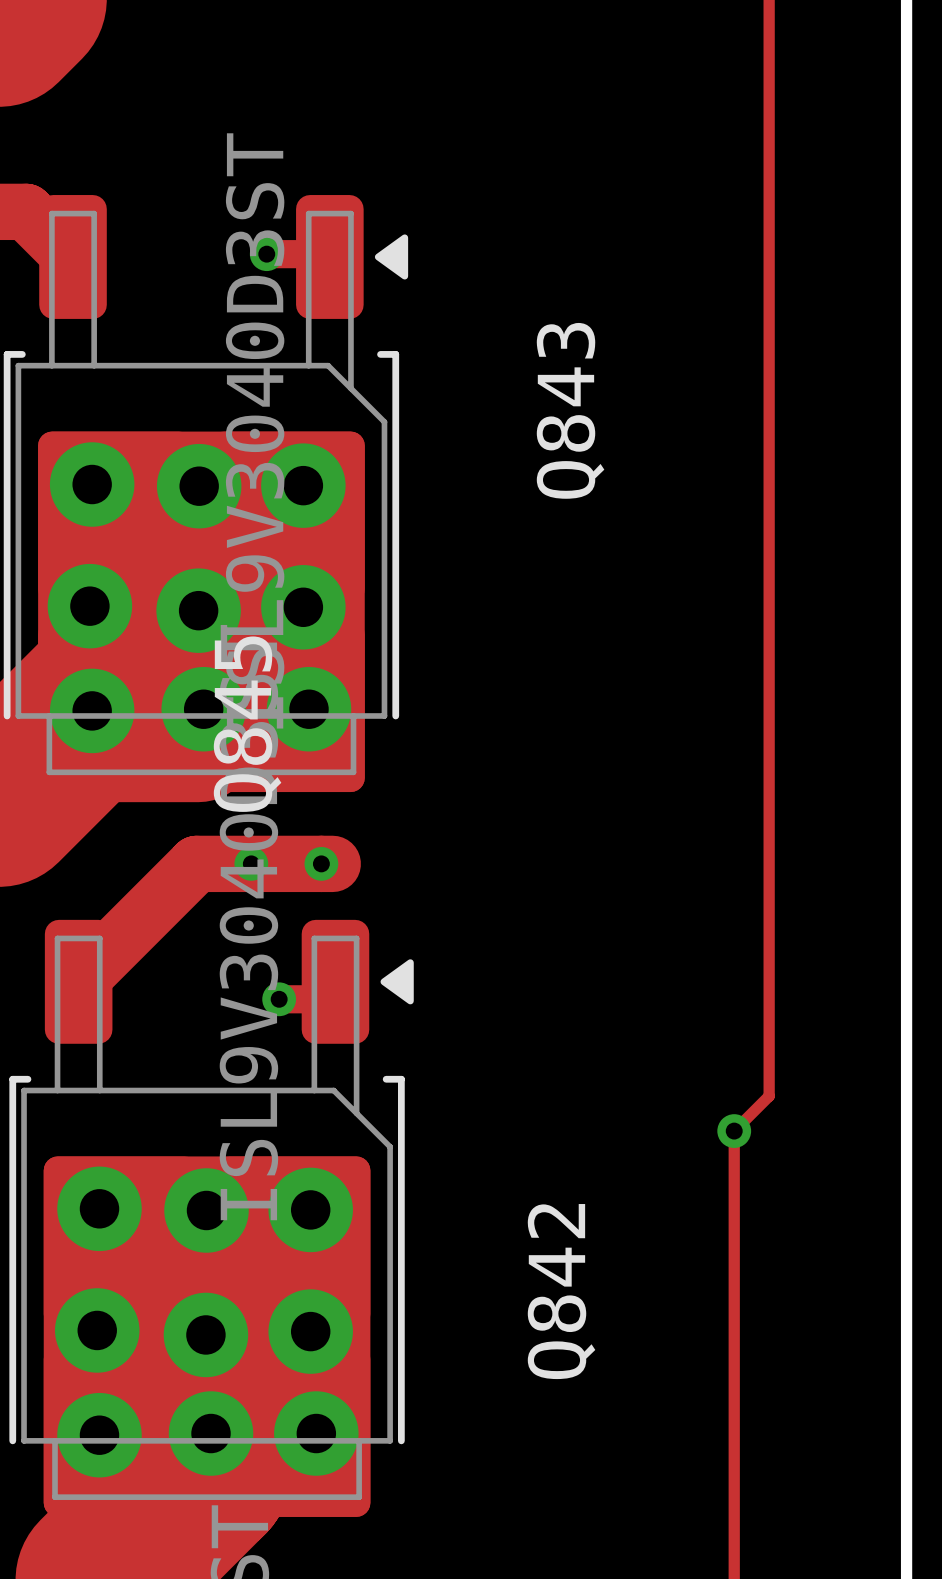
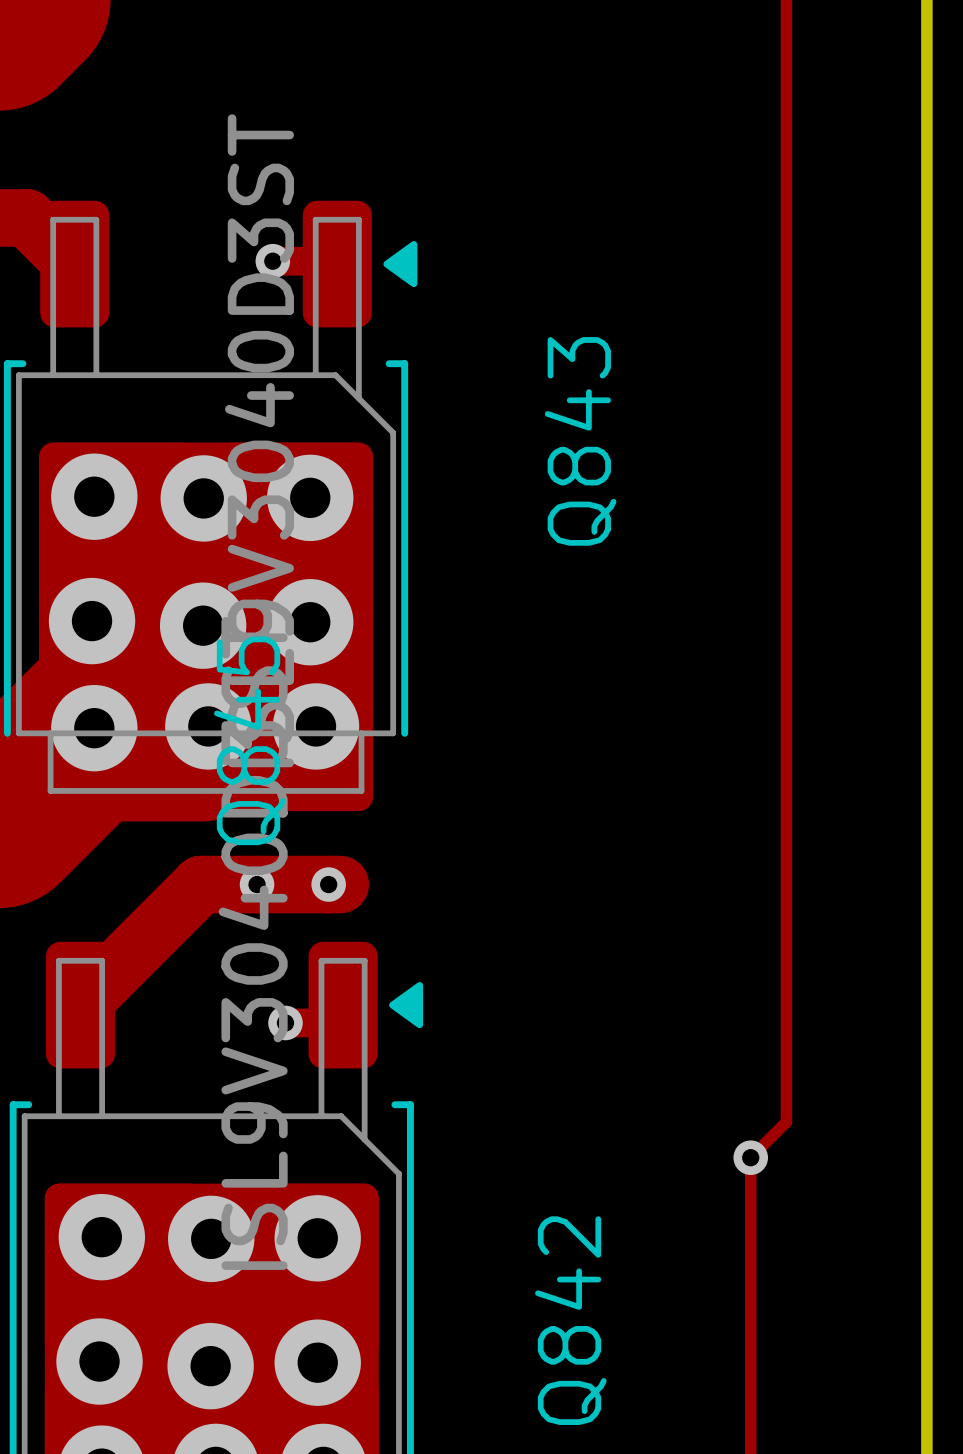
Q843 name position: Q843 (570, 410) -> Q843 (580, 441)

